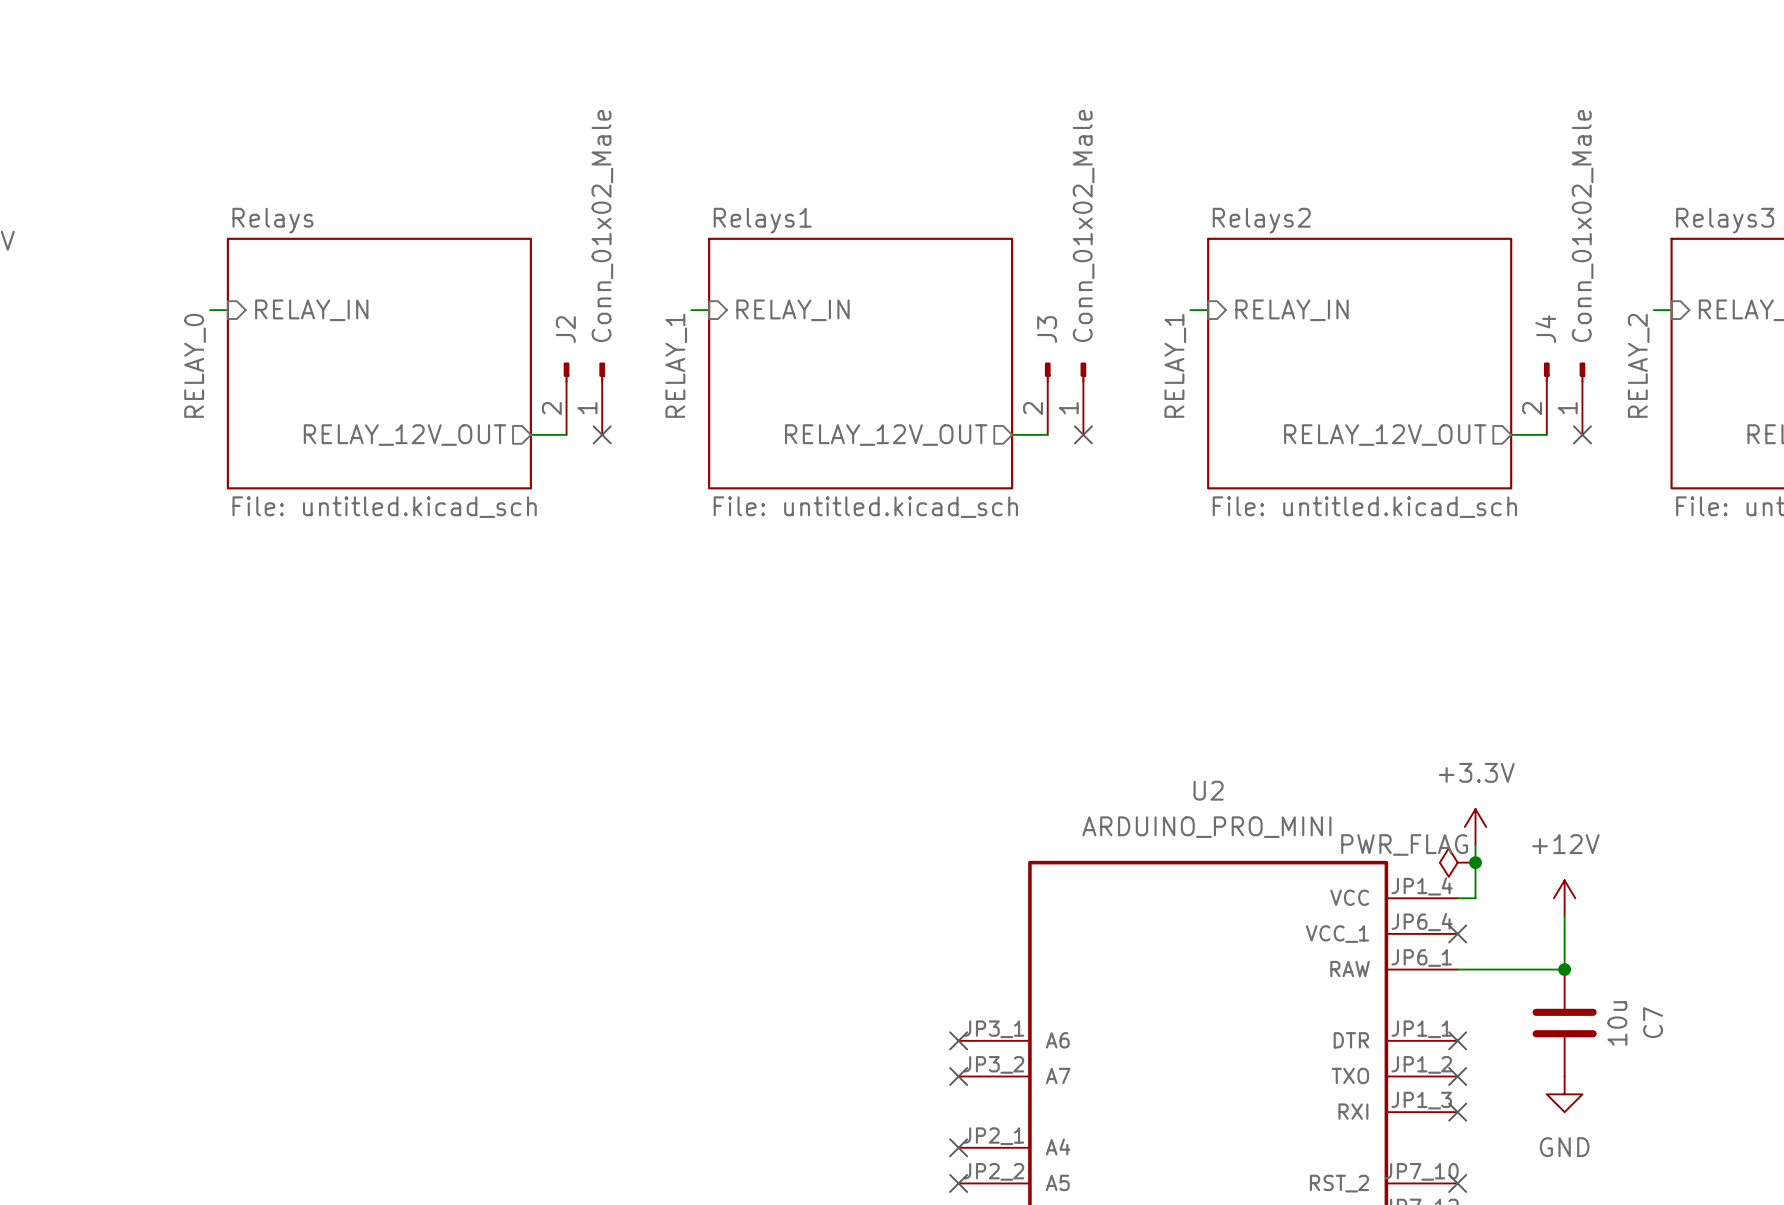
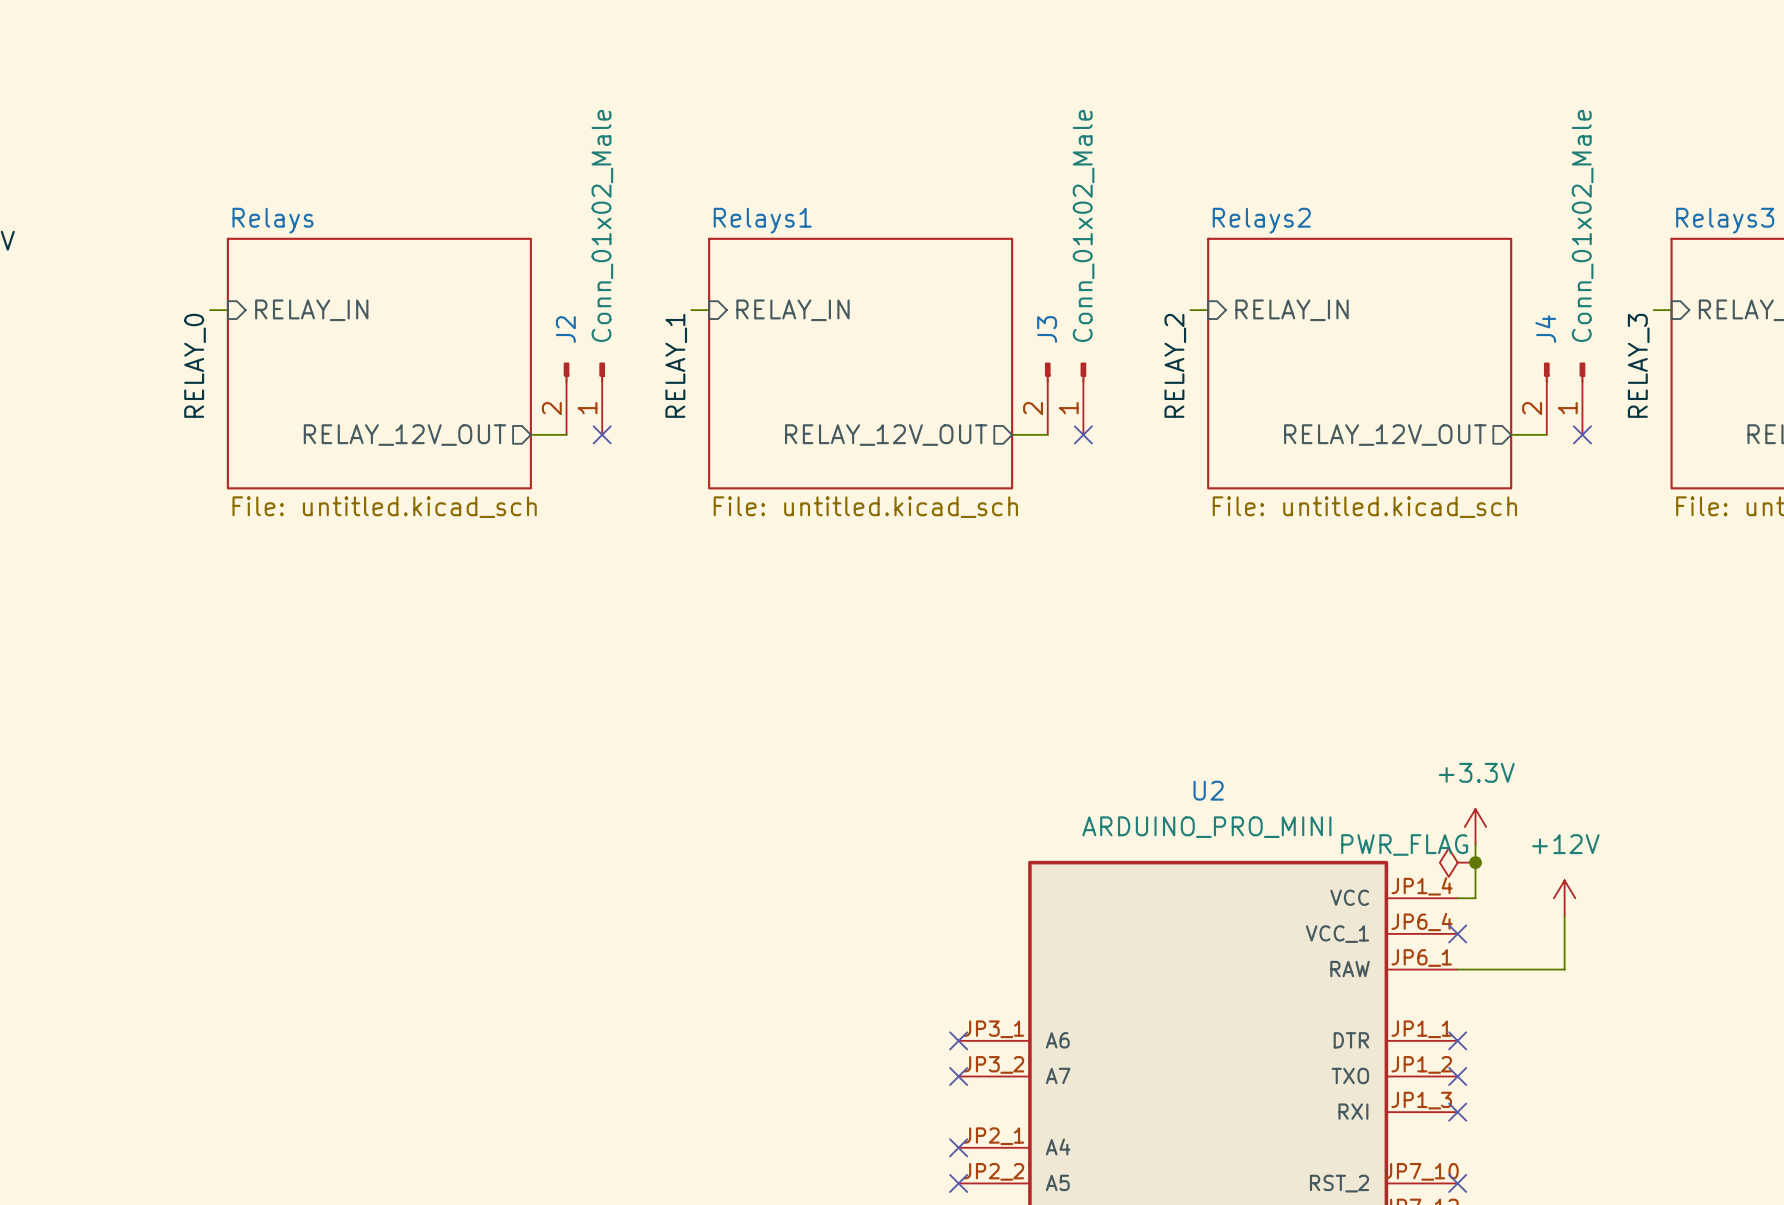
label: RELAY_1 (1175, 365) -> RELAY_2 (1175, 365)
label: RELAY_2 (1638, 365) -> RELAY_3 (1638, 365)
junction: (1564, 969) -> none
C7: 10u (1564, 1023) -> none
power symbol: GND (1564, 1094) -> none

